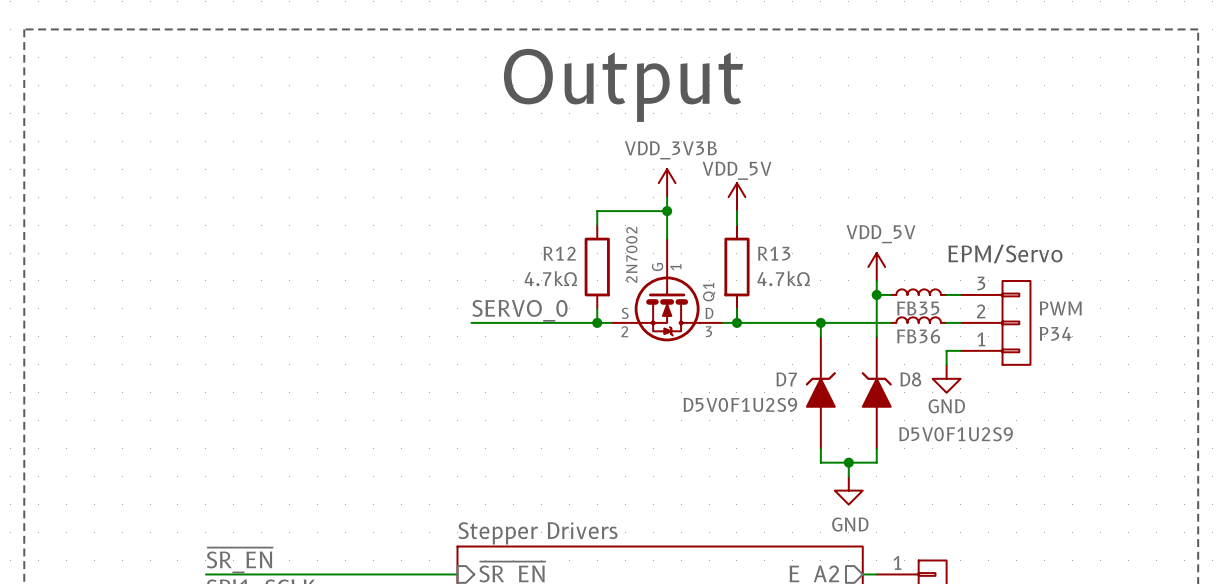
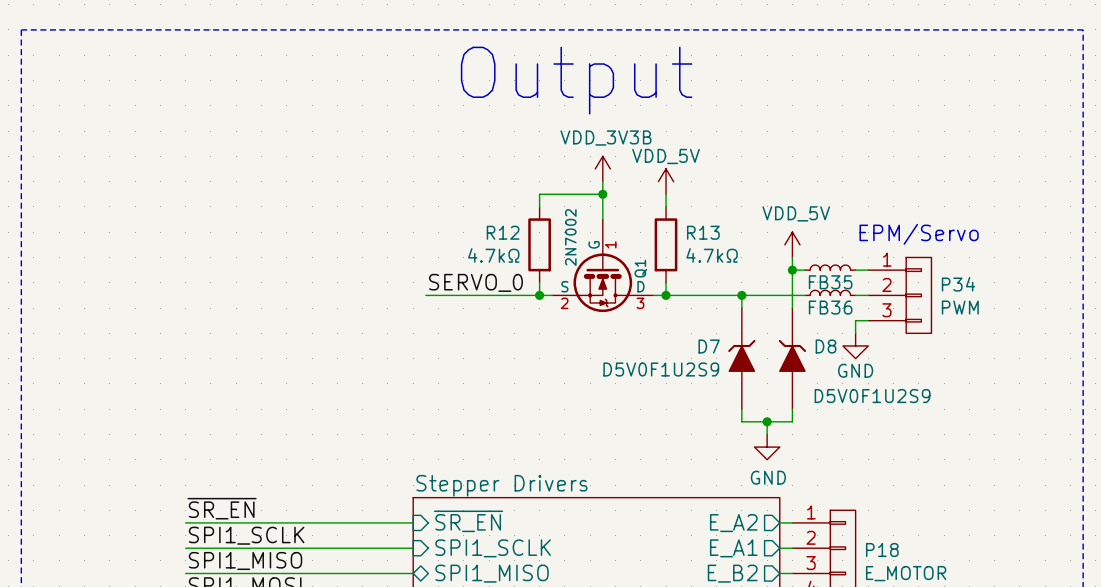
P34 flip: as is (1016, 322) -> up-down (918, 295)

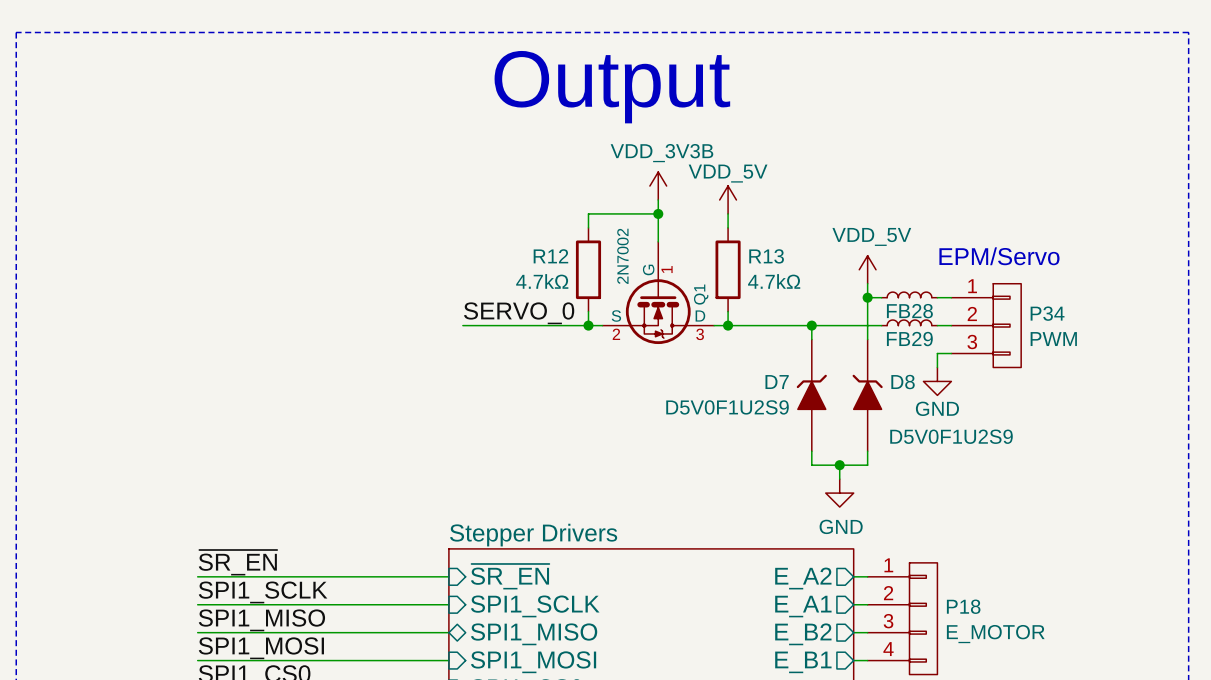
FB35 name: FB35 (830, 282) -> FB28 (909, 311)
FB36 name: FB36 (830, 307) -> FB29 (909, 339)

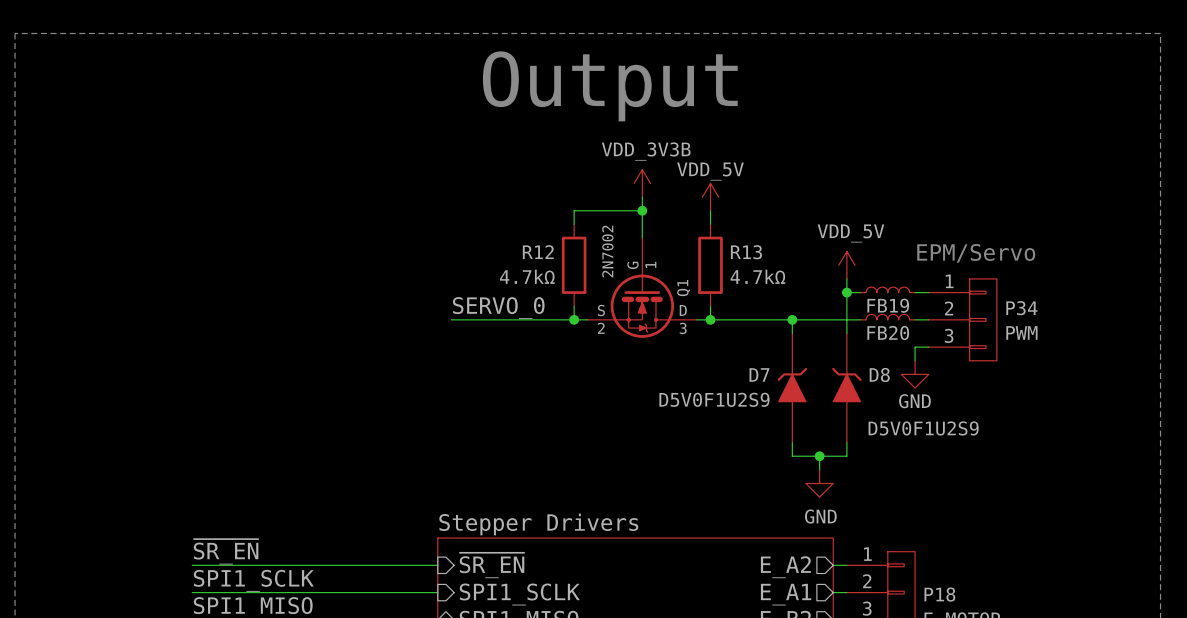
FB28 name: FB28 (909, 311) -> FB19 (888, 305)
FB29 name: FB29 (909, 339) -> FB20 (888, 333)

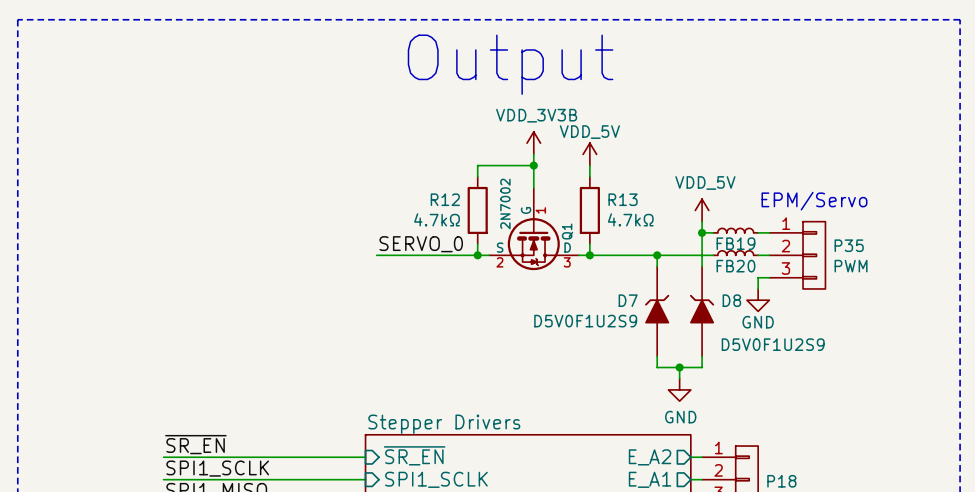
P34 name: P34 (1021, 308) -> P35 (849, 245)

